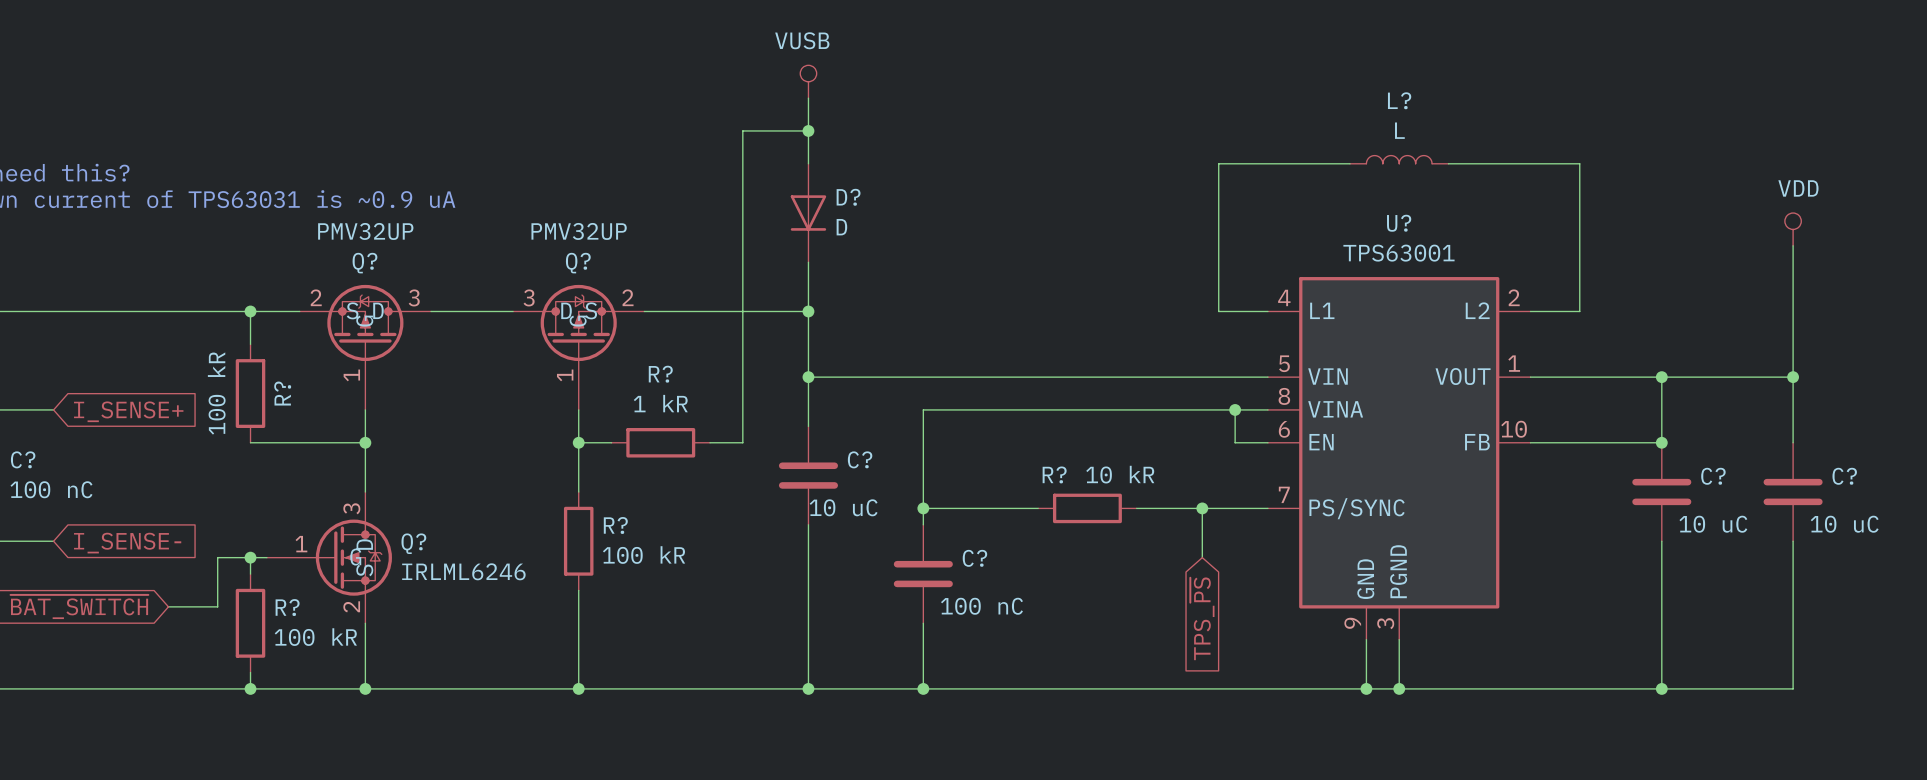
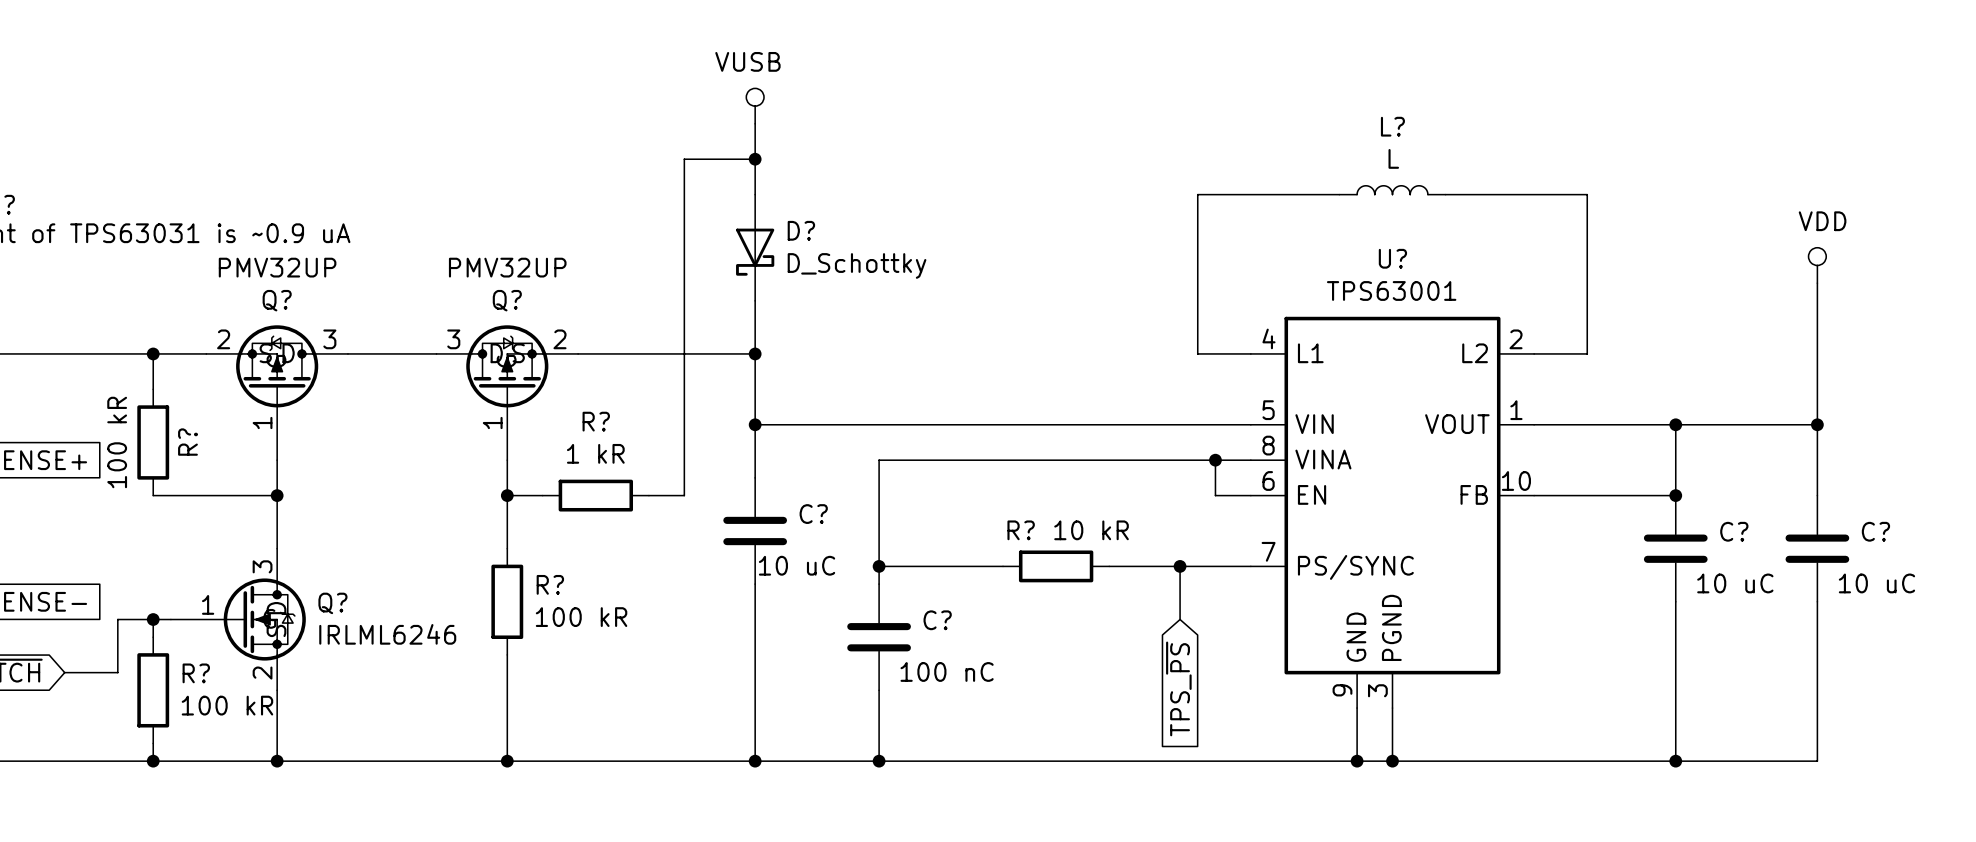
D? symbol: [790, 163, 827, 263] -> [736, 194, 775, 301]
D? value: D (841, 227) -> D_Schottky (857, 265)

